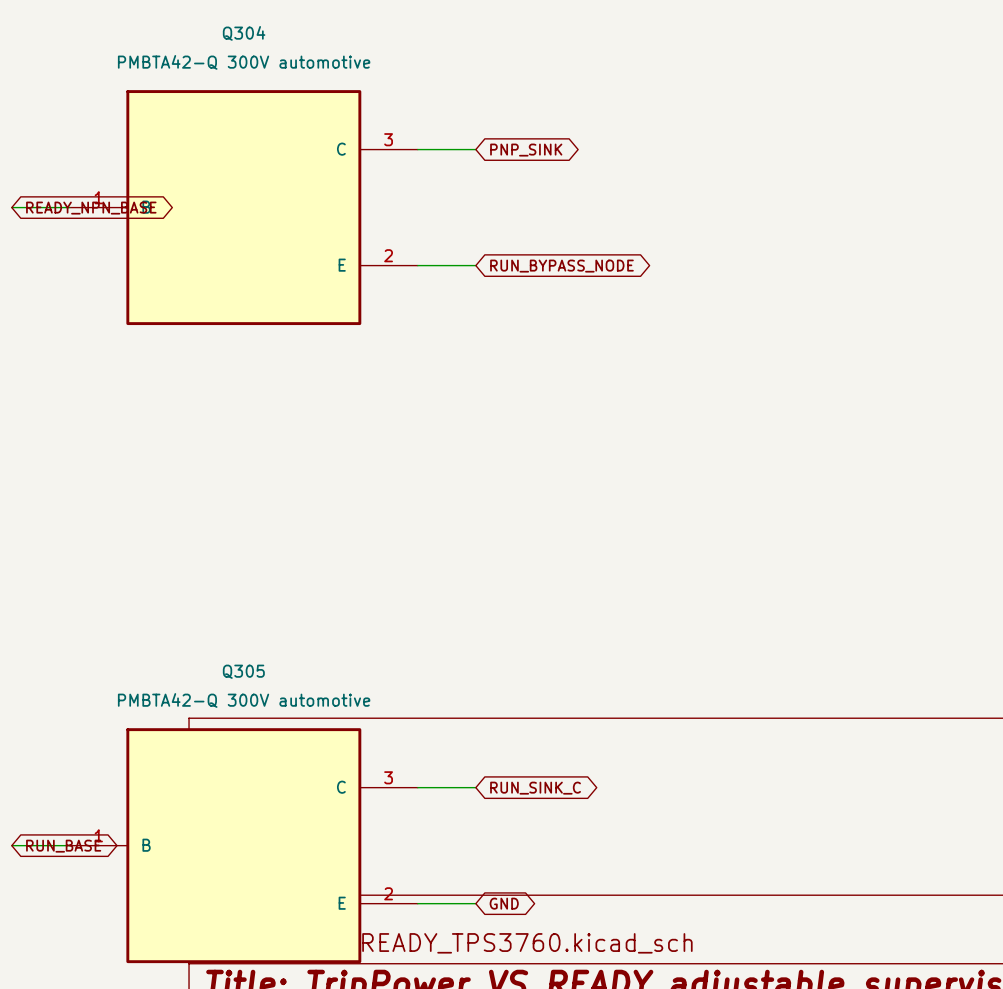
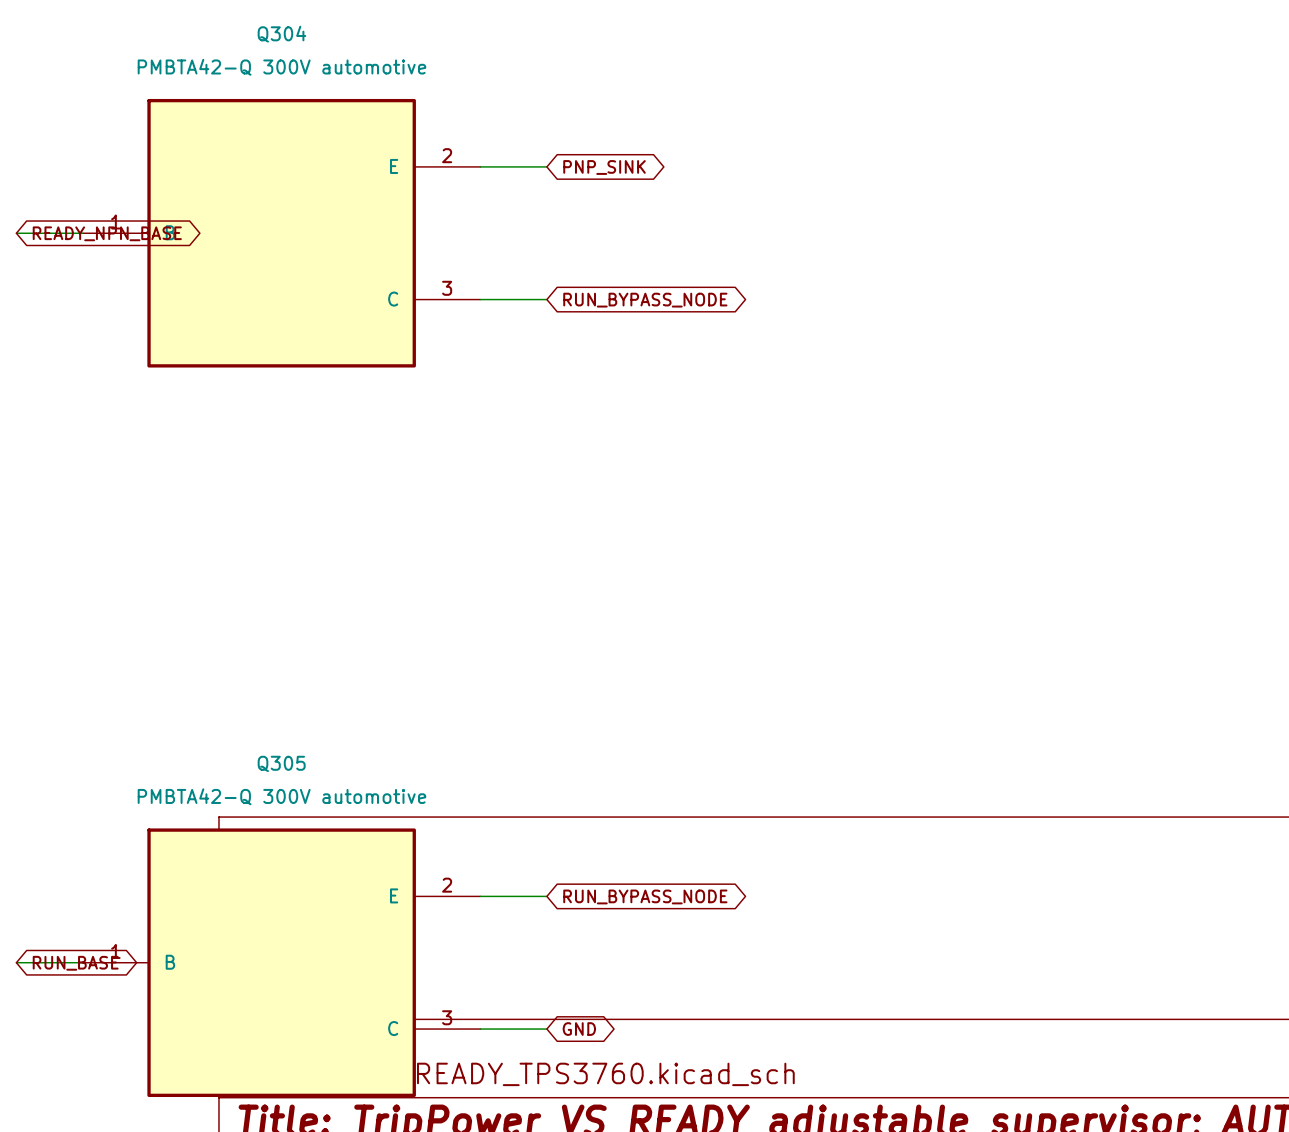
Q304 flip: as is (243, 207) -> up-down (281, 233)
global label: RUN_SINK_C (535, 788) -> RUN_BYPASS_NODE (645, 896)
Q305 flip: as is (243, 845) -> up-down (281, 962)

